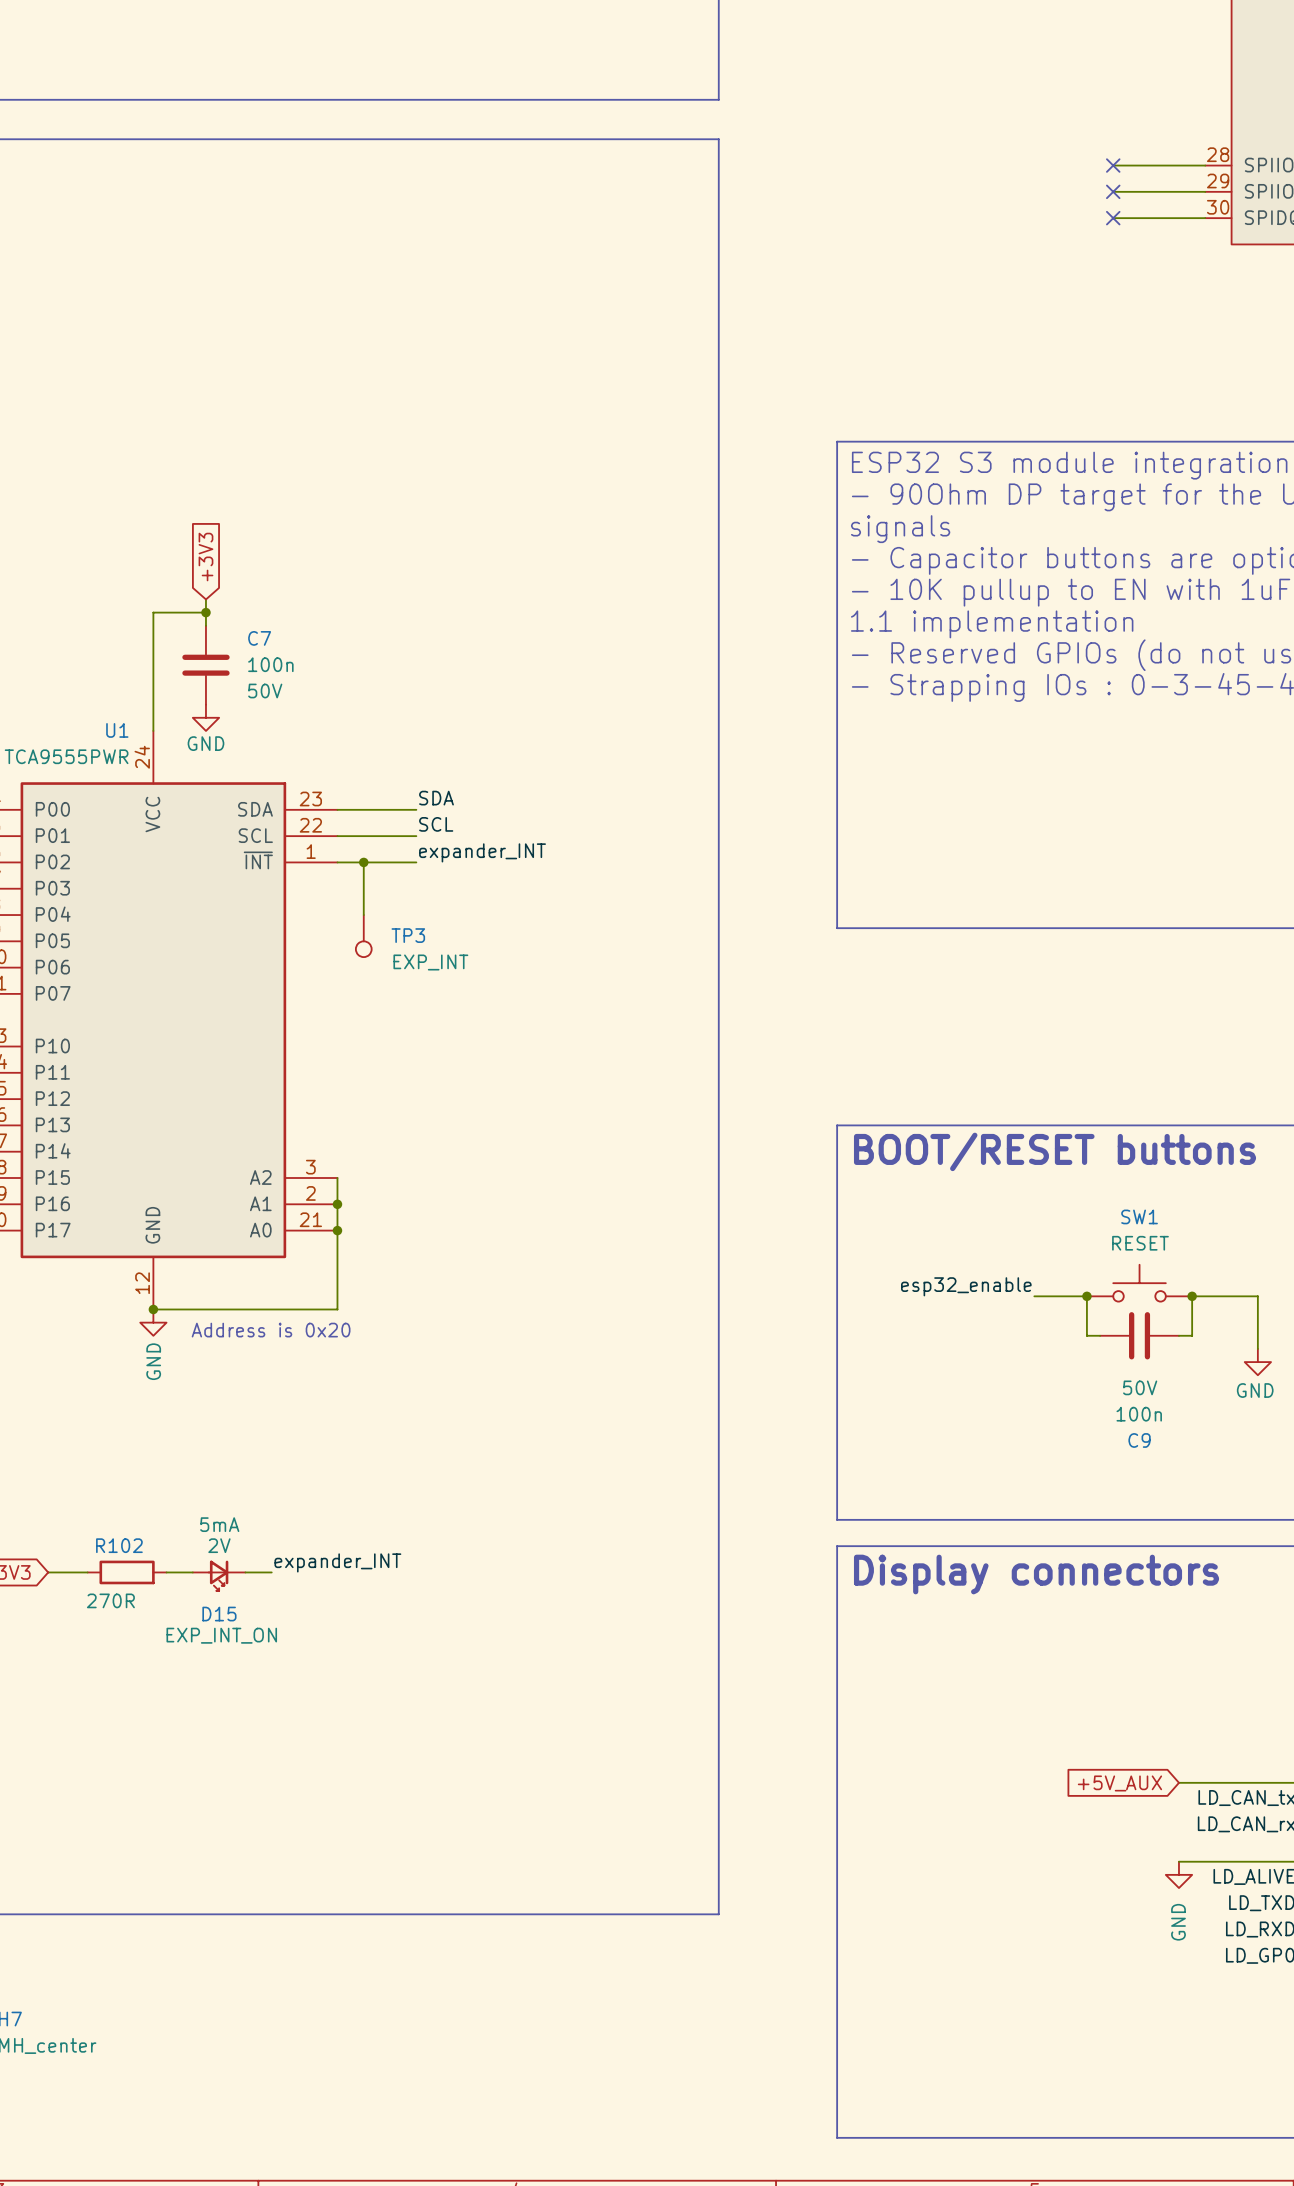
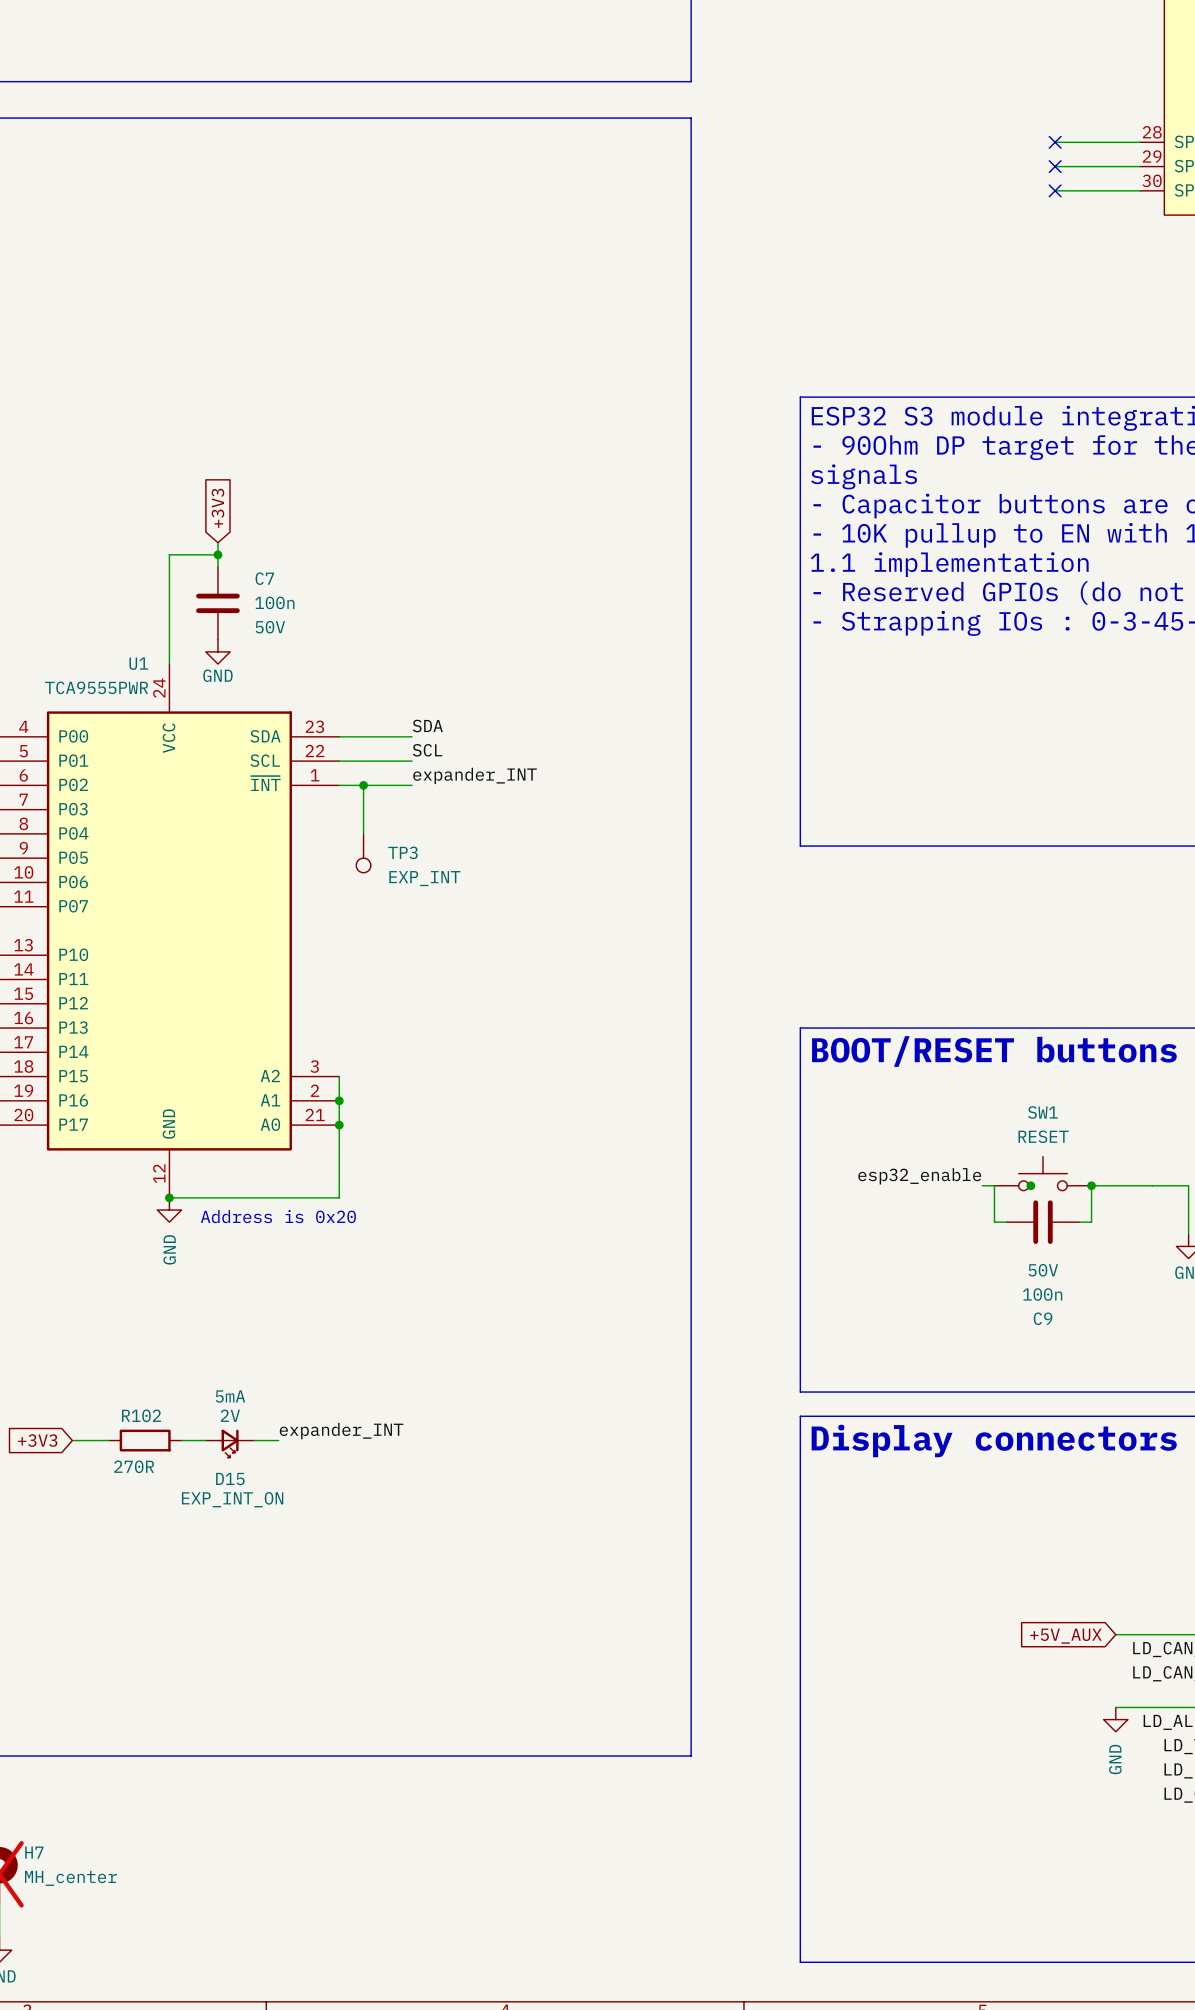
SW1 position: (1139, 1283) -> (1043, 1173)
wire: (1047, 1296) (1086, 1296) (1086, 1335) (1100, 1335) -> (994, 1185) (994, 1222) (1006, 1222)
wire: (1192, 1296) (1192, 1335) (1178, 1335) -> (1127, 1185) (1091, 1185) (1091, 1222) (1079, 1222)
junction position: (1192, 1296) -> (1091, 1185)
C9 position: (1139, 1335) -> (1043, 1222)

